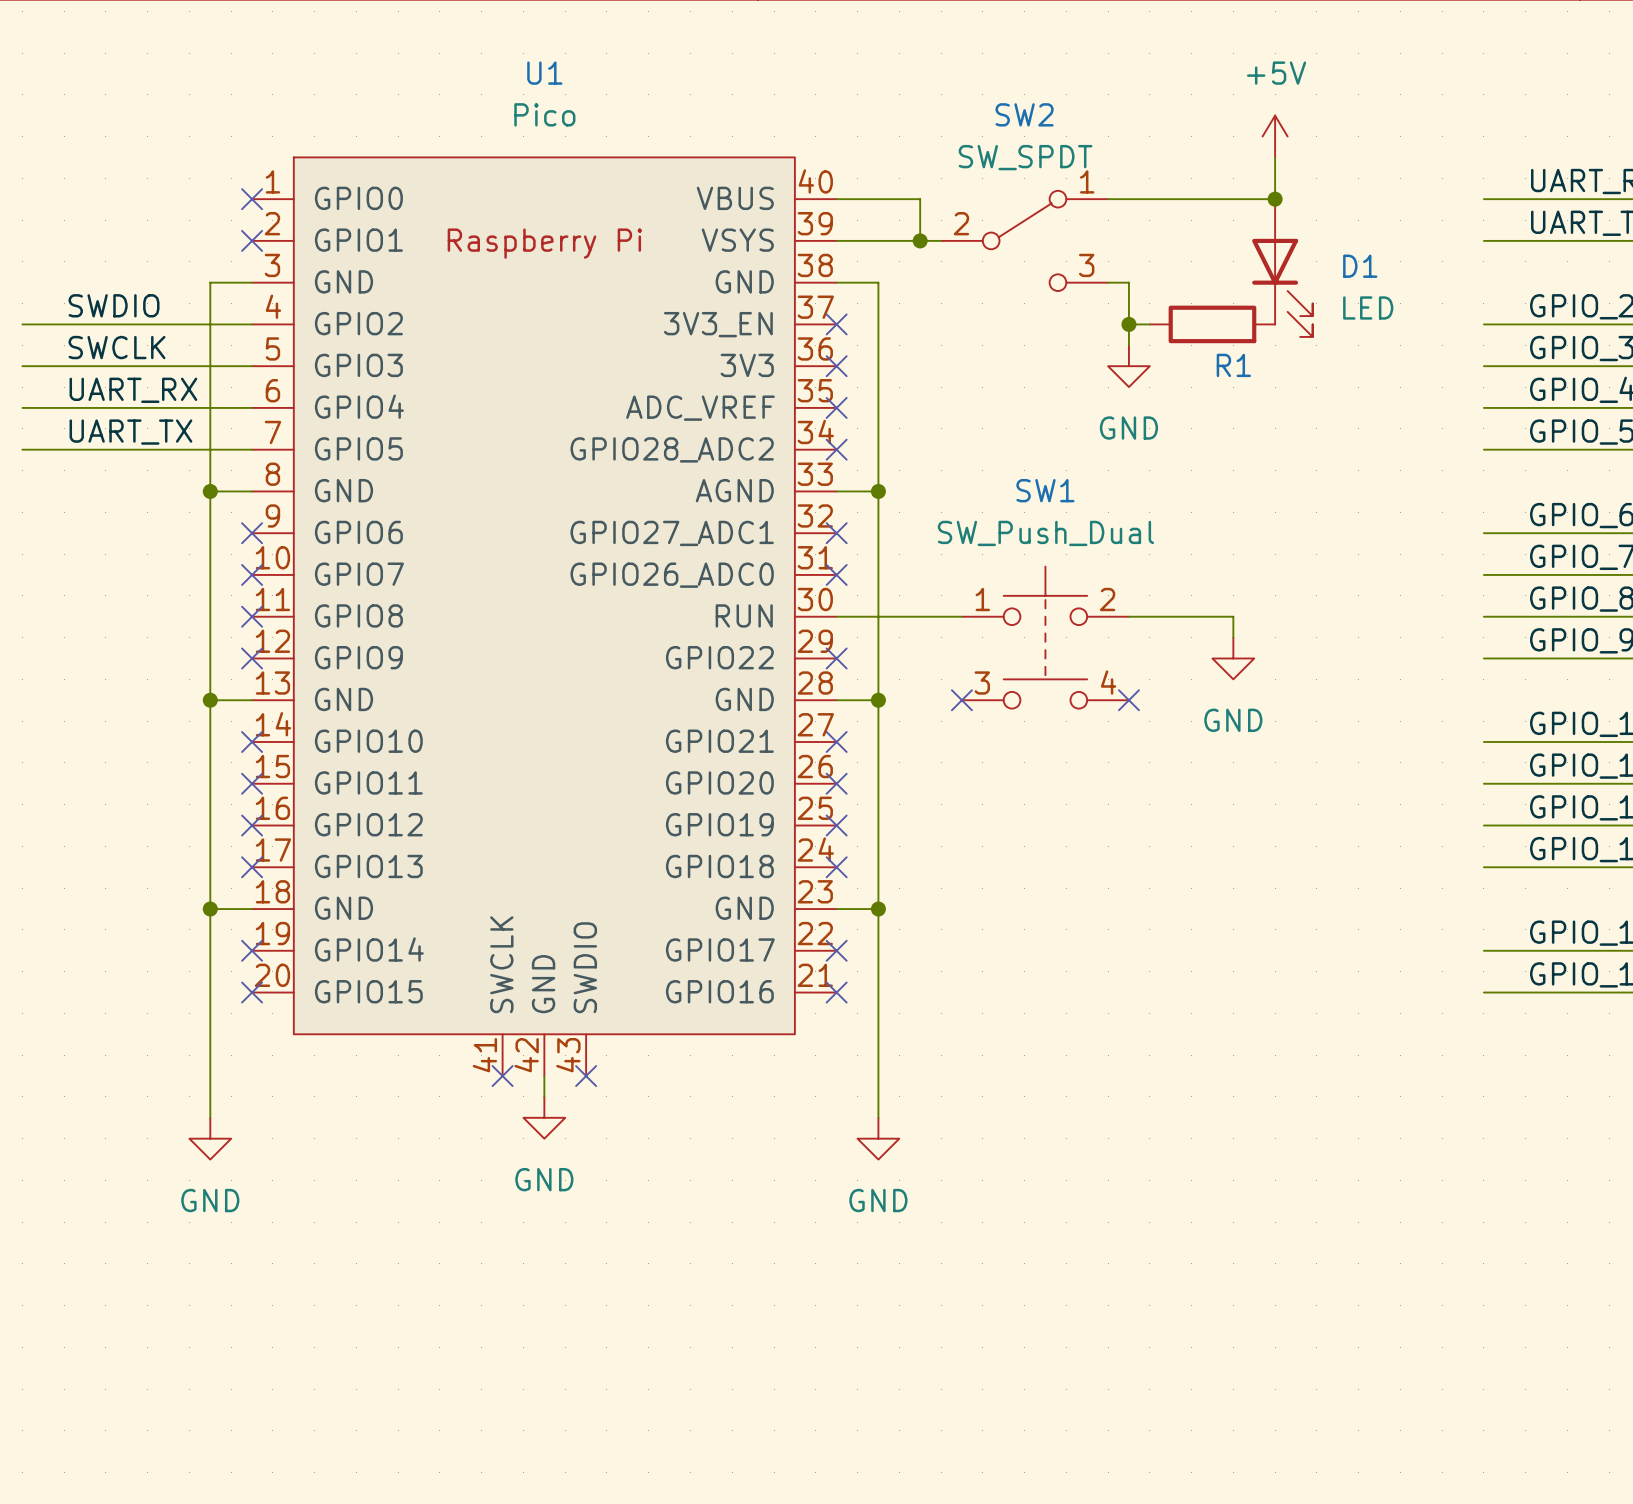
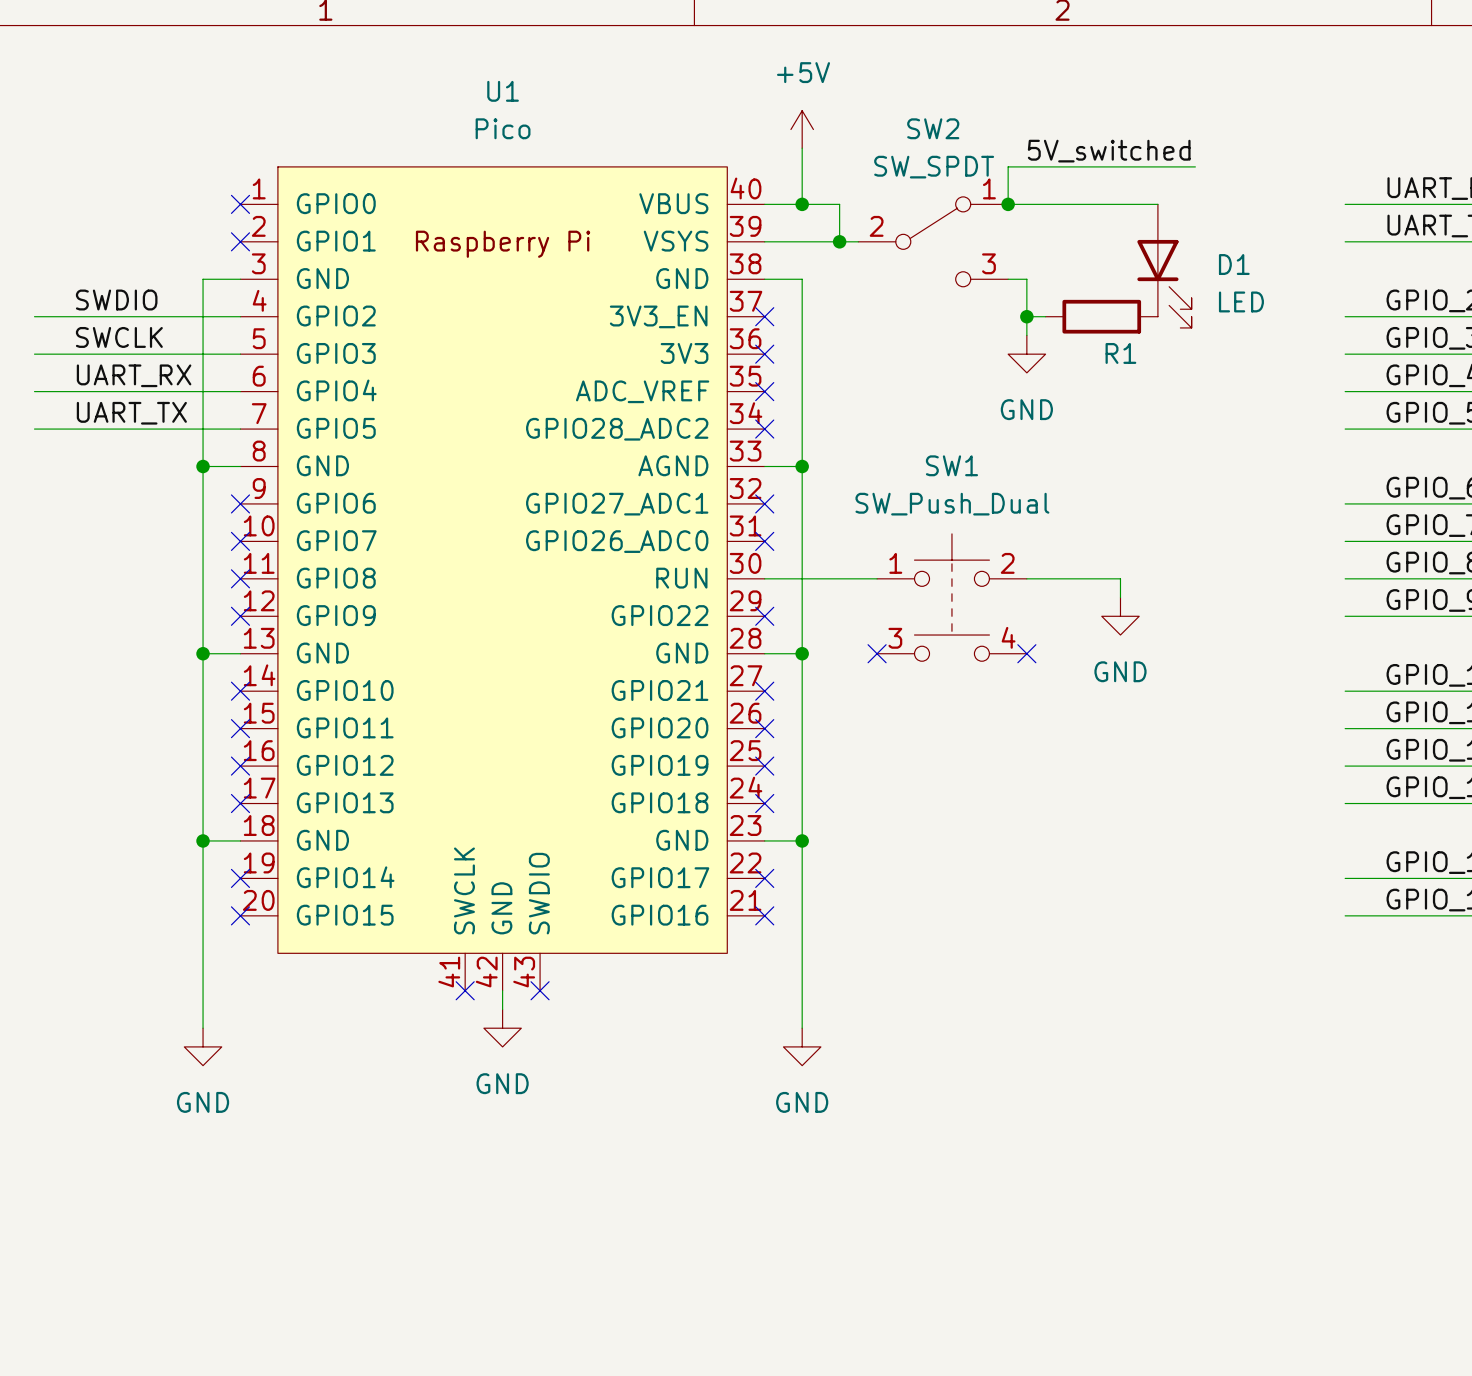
wire: none -> (802, 148) (802, 204)
power symbol position: +5V (1275, 136) -> +5V (802, 129)
label: none -> 5V_switched (1109, 151)
wire: (1275, 157) (1275, 199) -> none
wire: none -> (1195, 166) (1008, 166) (1008, 204)
junction: none -> (802, 204)
junction: none -> (1008, 204)
junction: (1275, 199) -> none

